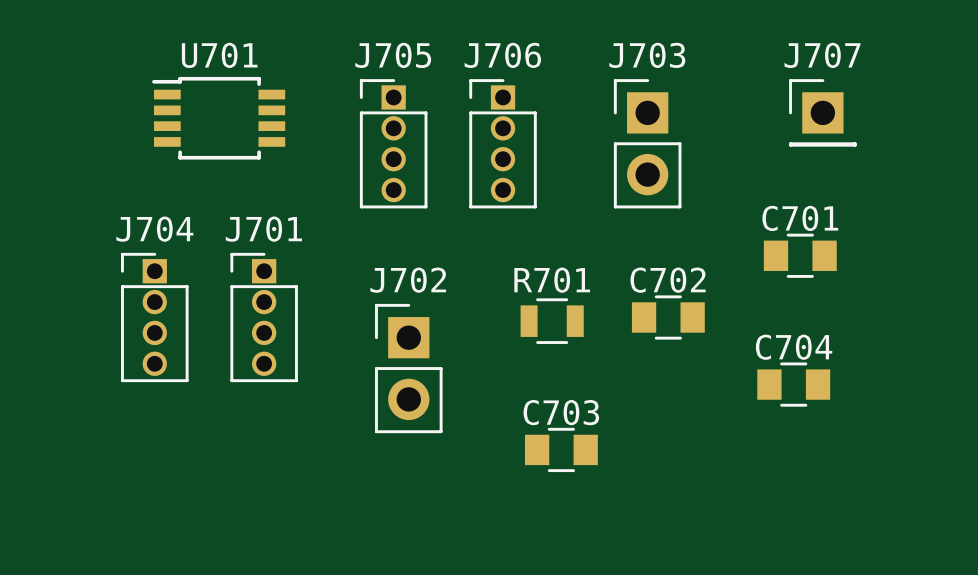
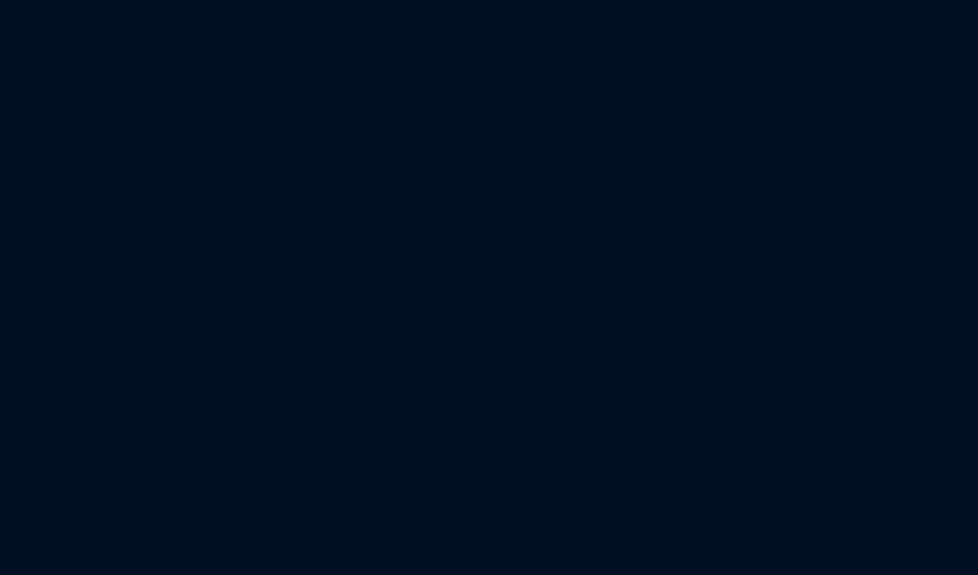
J707: (822, 112) -> none
U701: (218, 118) -> none
J705: (393, 143) -> none
J706: (503, 143) -> none
J703: (647, 143) -> none
C701: (800, 255) -> none
J704: (154, 317) -> none
J701: (264, 317) -> none
C702: (668, 317) -> none
R701: (552, 321) -> none
J702: (408, 368) -> none
C704: (793, 384) -> none
C703: (561, 449) -> none

